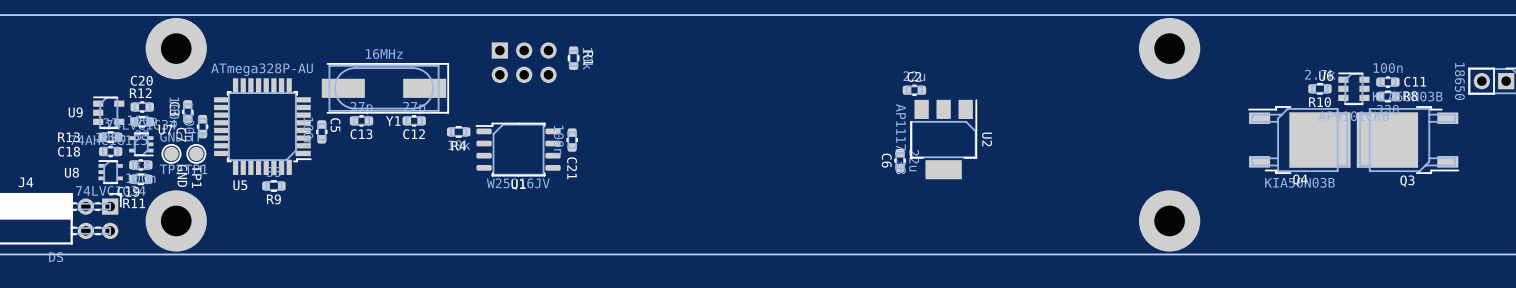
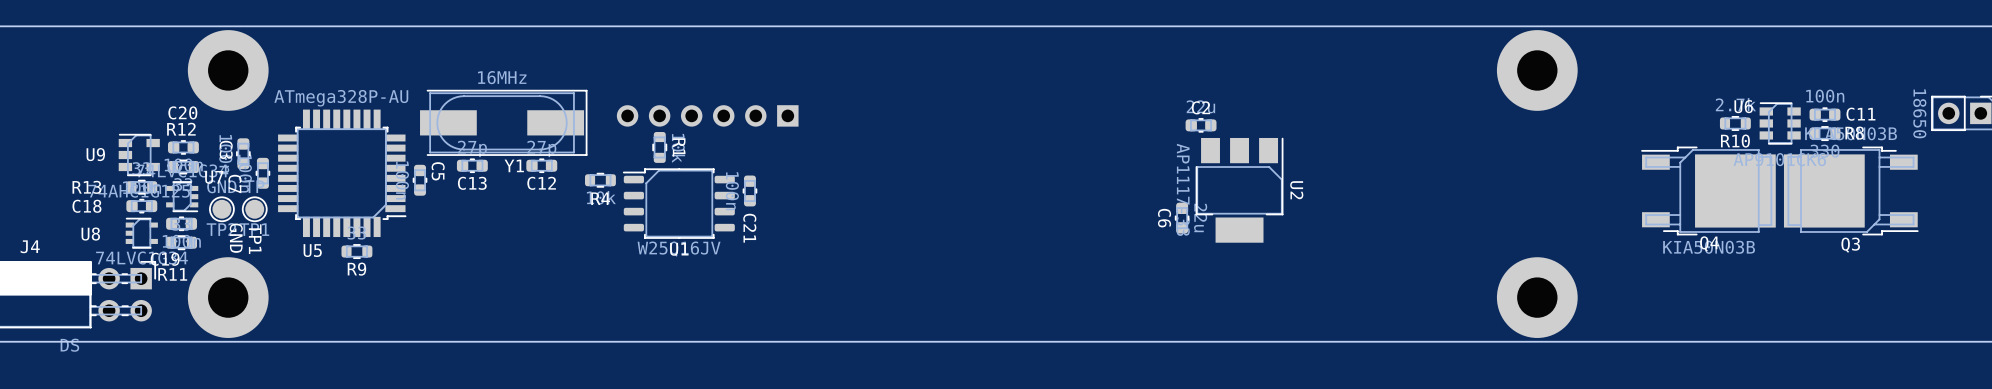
R1 position: (573, 58) -> (659, 147)
part: (524, 62) -> none
part: none -> (707, 115)

